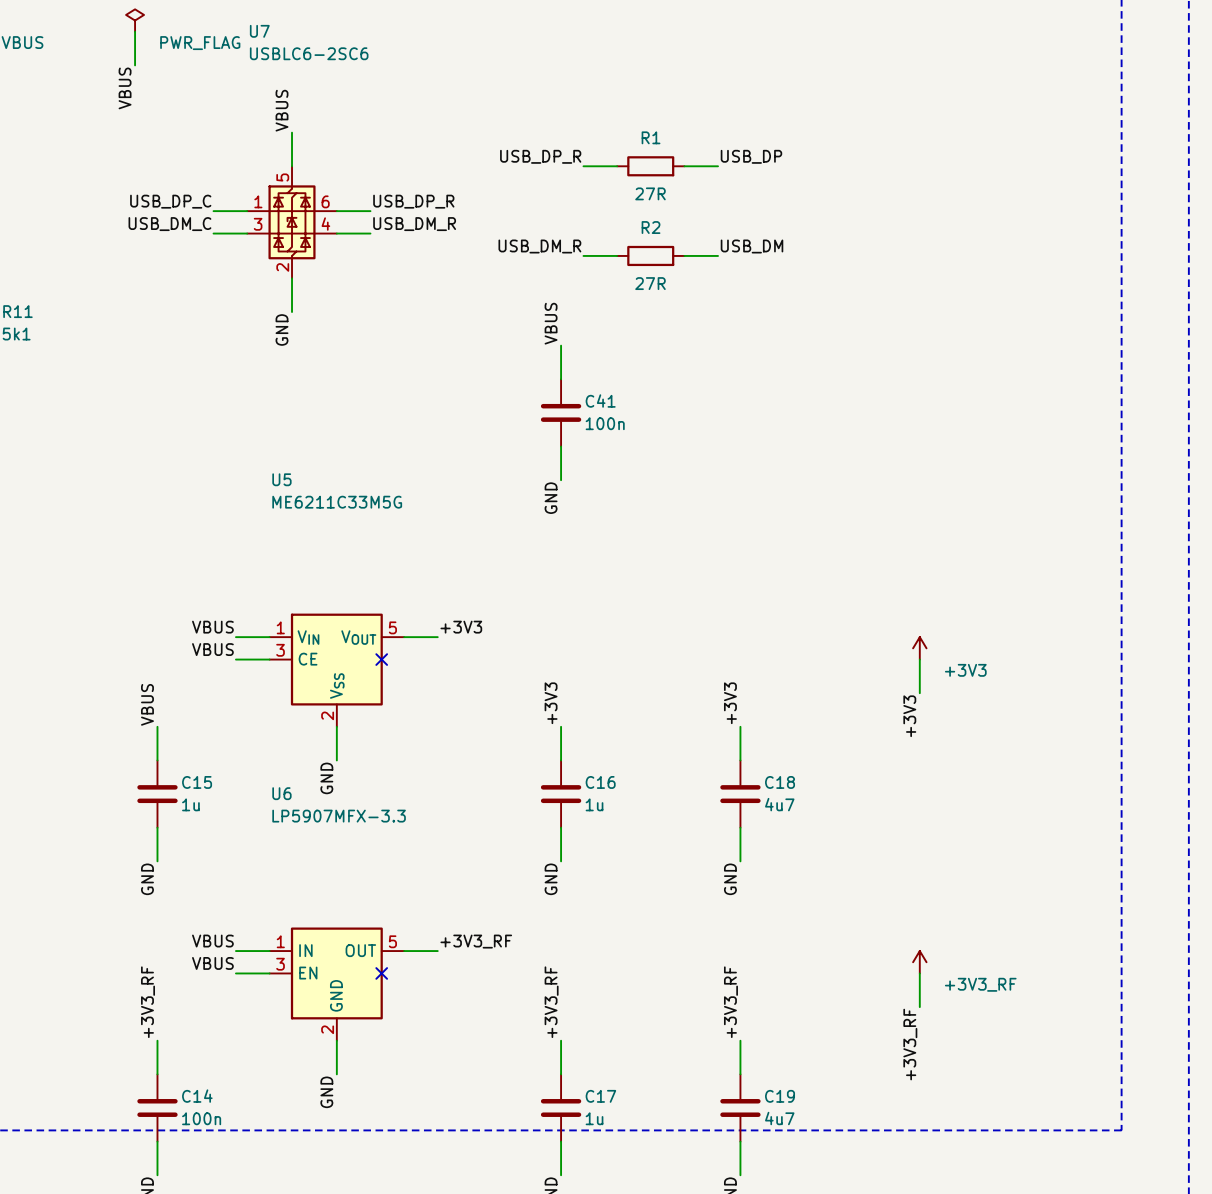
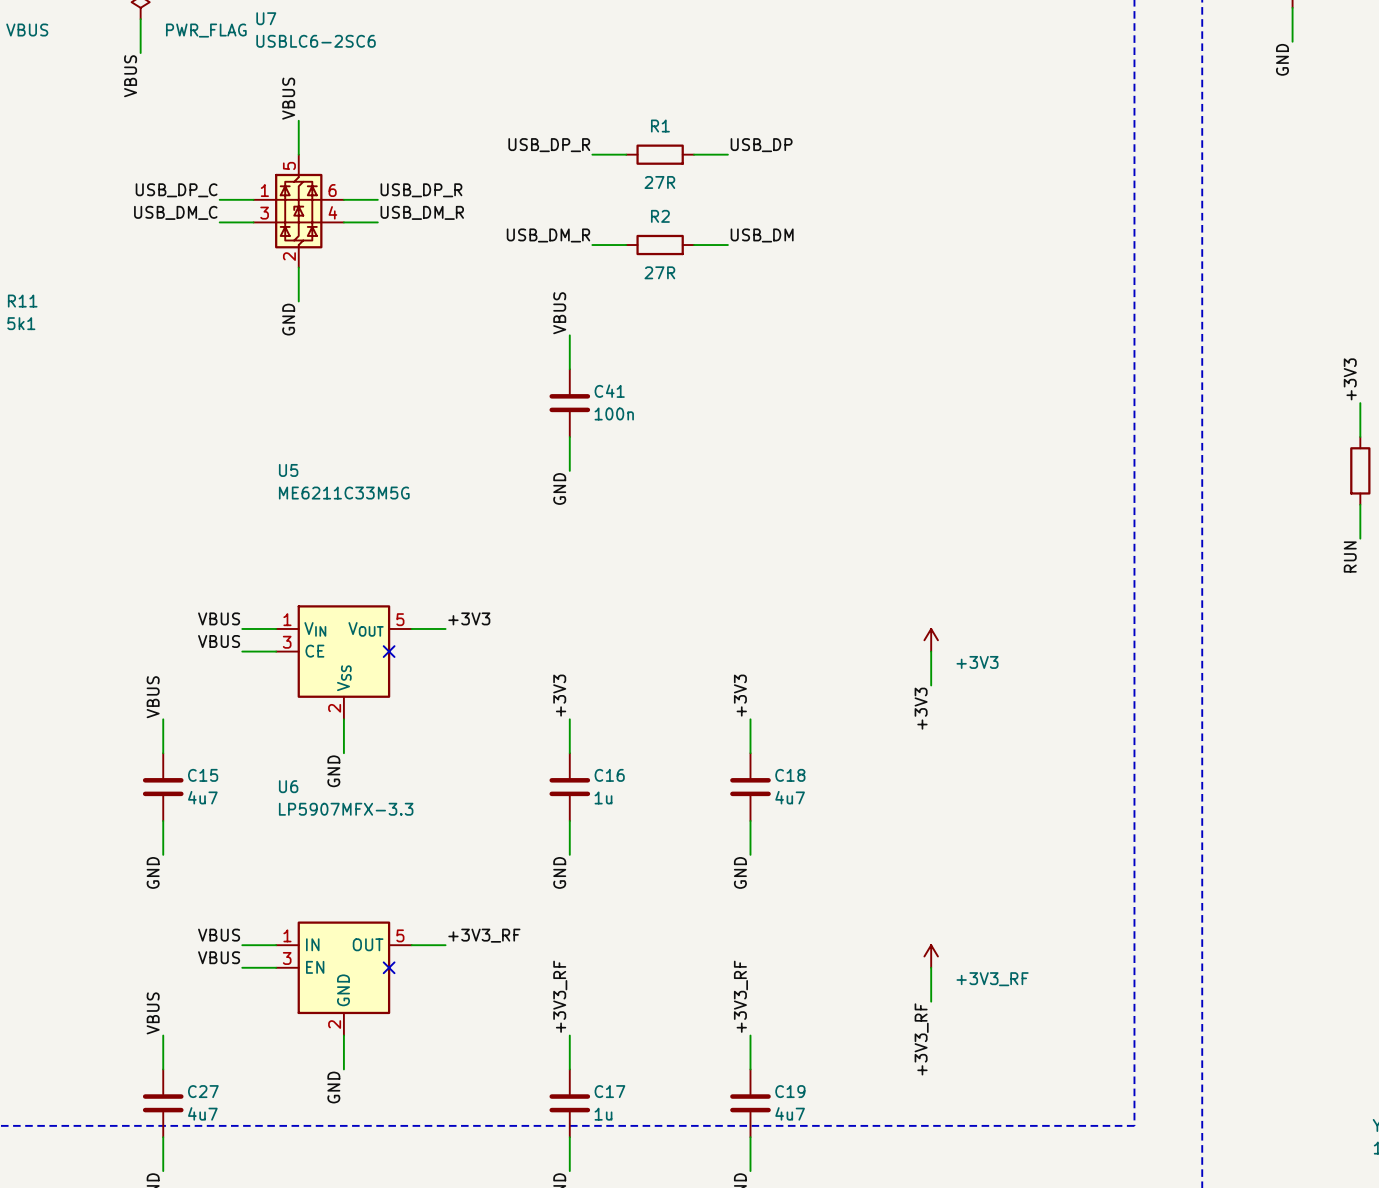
C15 value: 1u (190, 804) -> 4u7 (202, 797)
label: +3V3_RF (148, 1002) -> VBUS (153, 1013)
C14 name: C14 (197, 1096) -> C27 (203, 1091)
C14 value: 100n (201, 1118) -> 4u7 (202, 1113)

